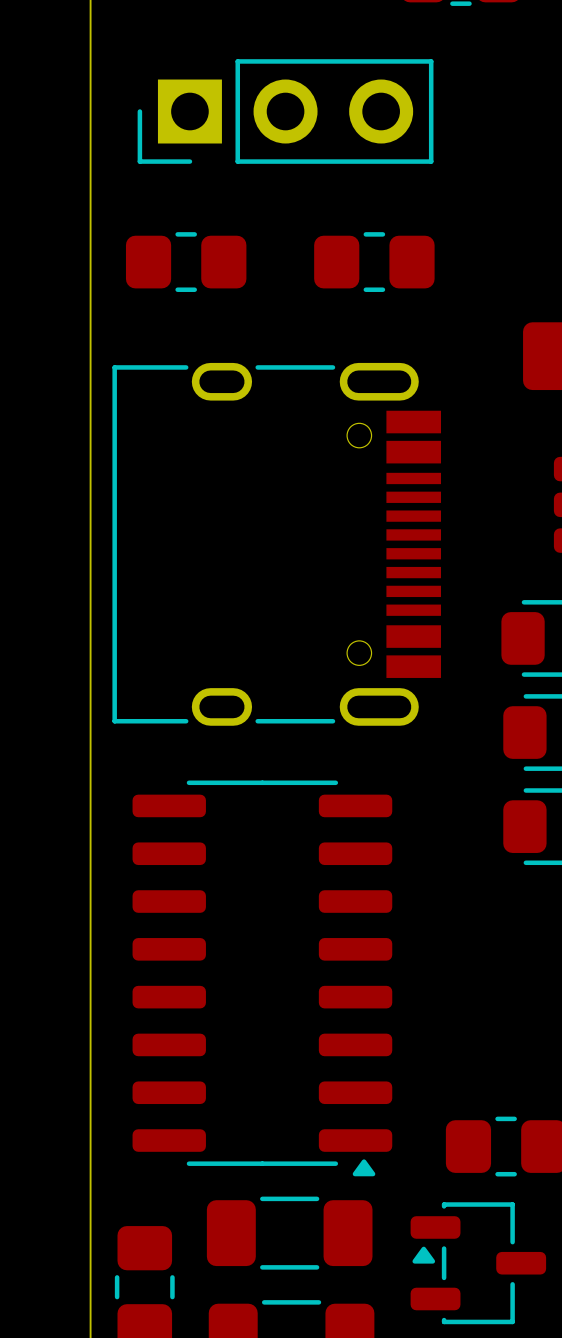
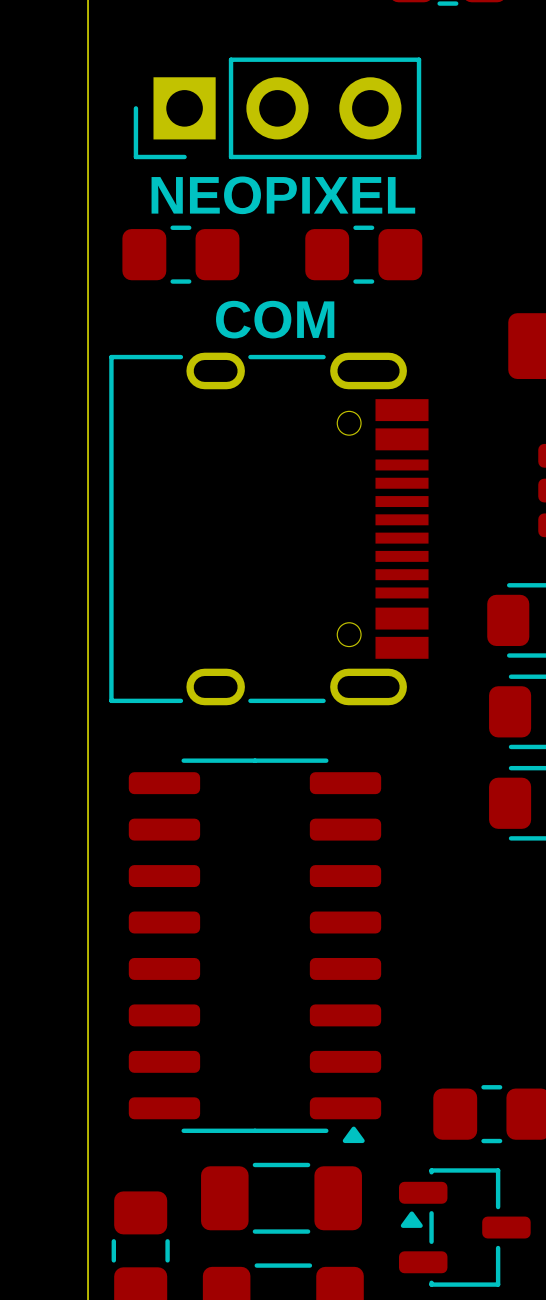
text: none -> NEOPIXEL (283, 195)
text: none -> COM (275, 319)

